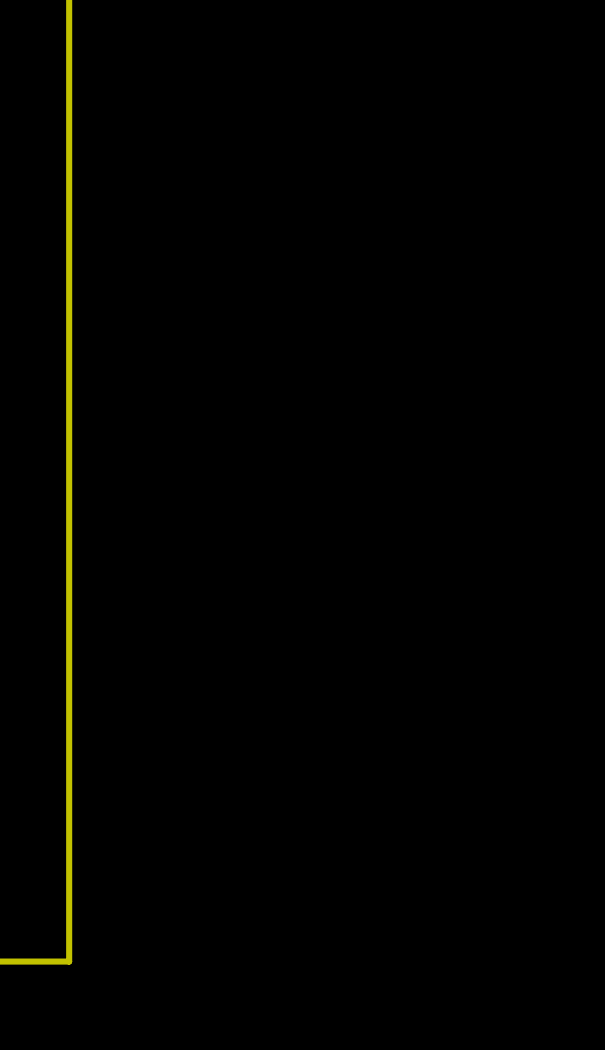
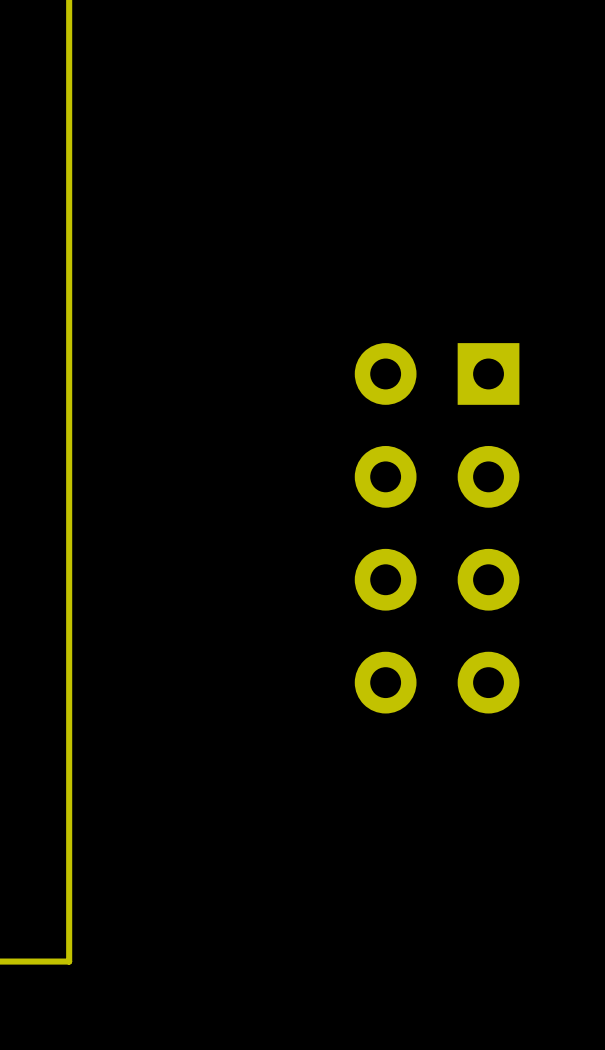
part: none -> (437, 528)

